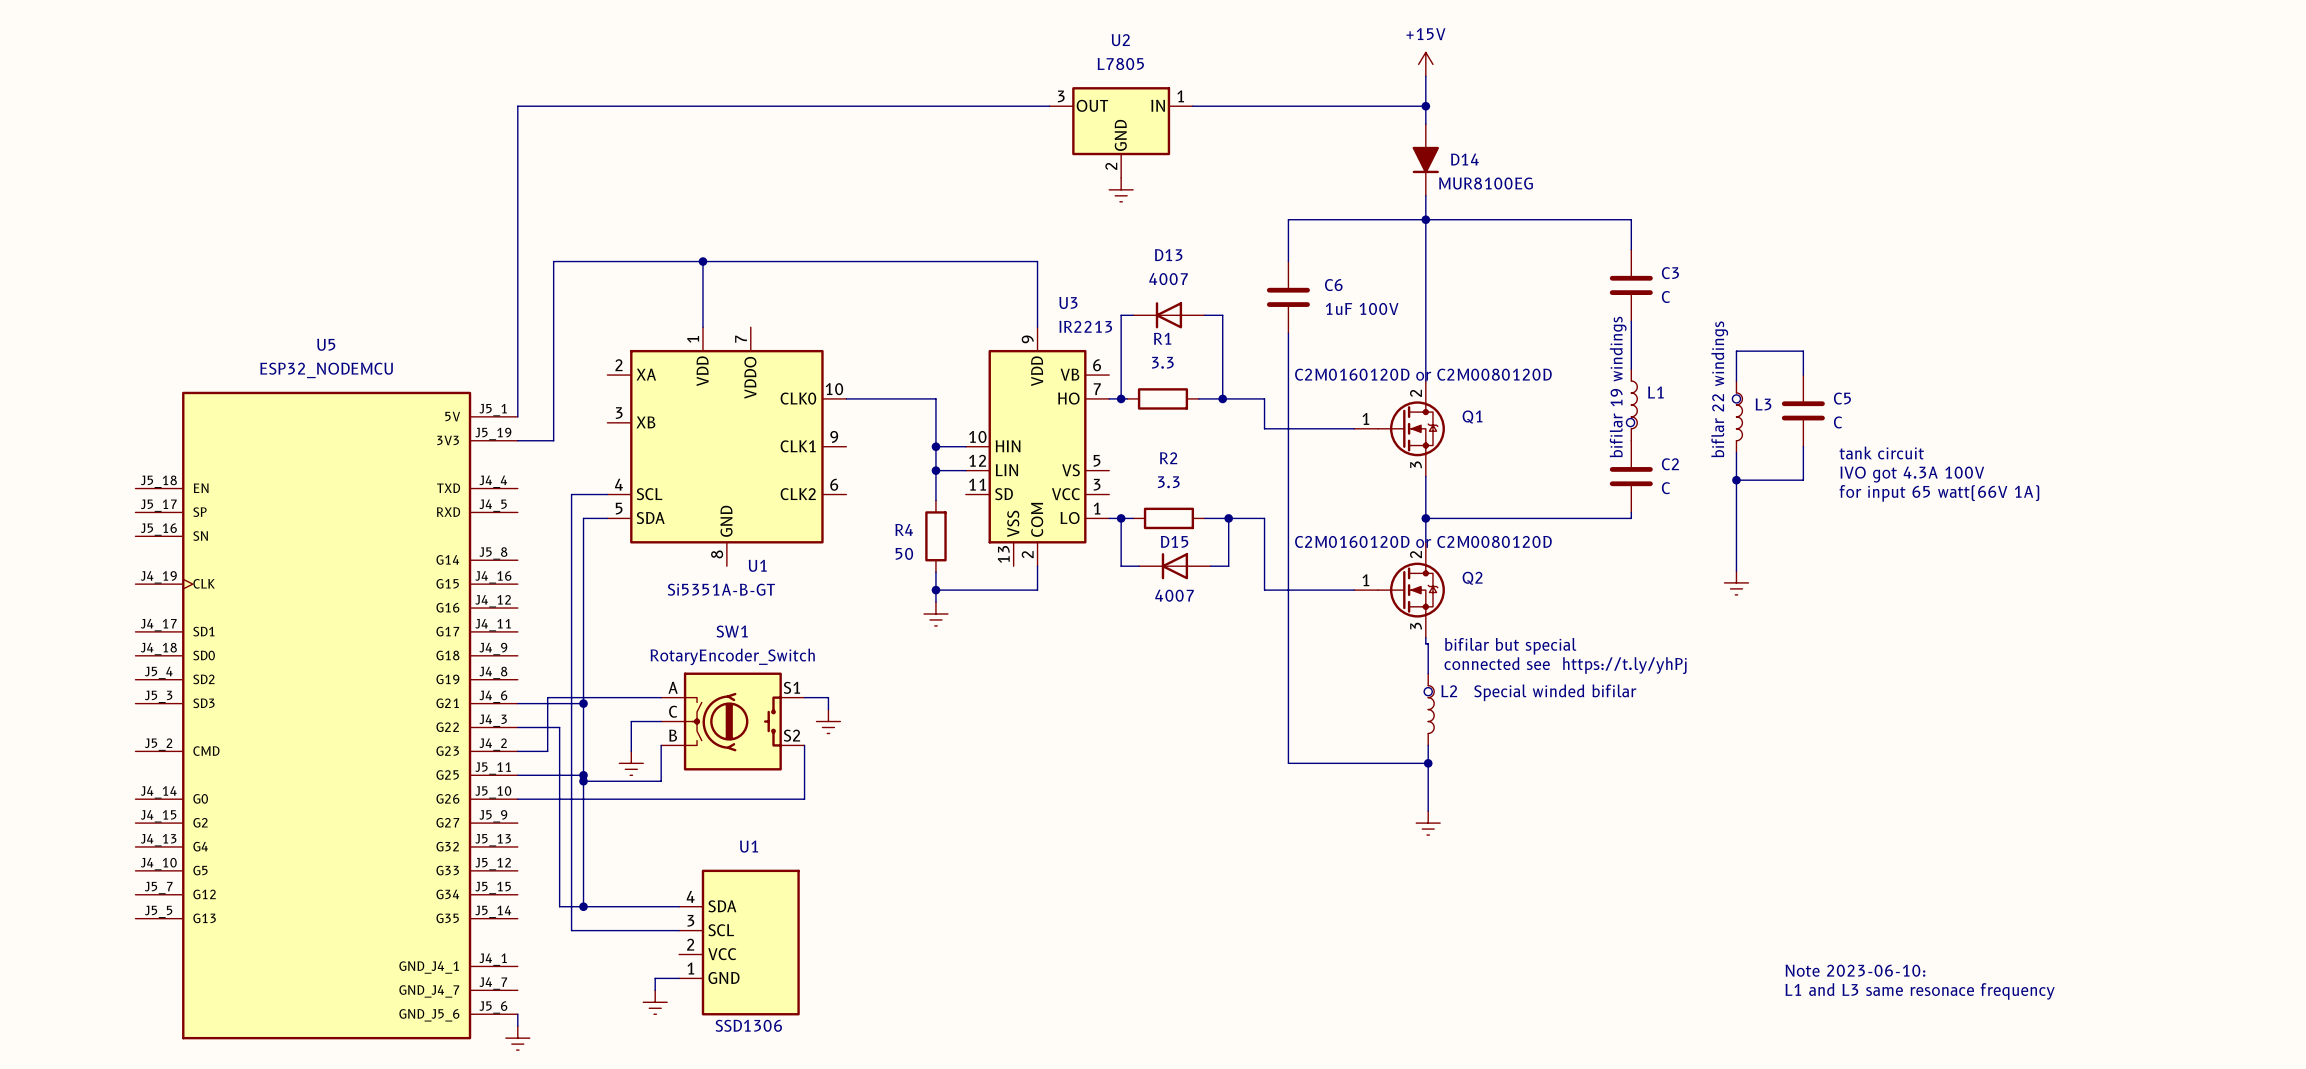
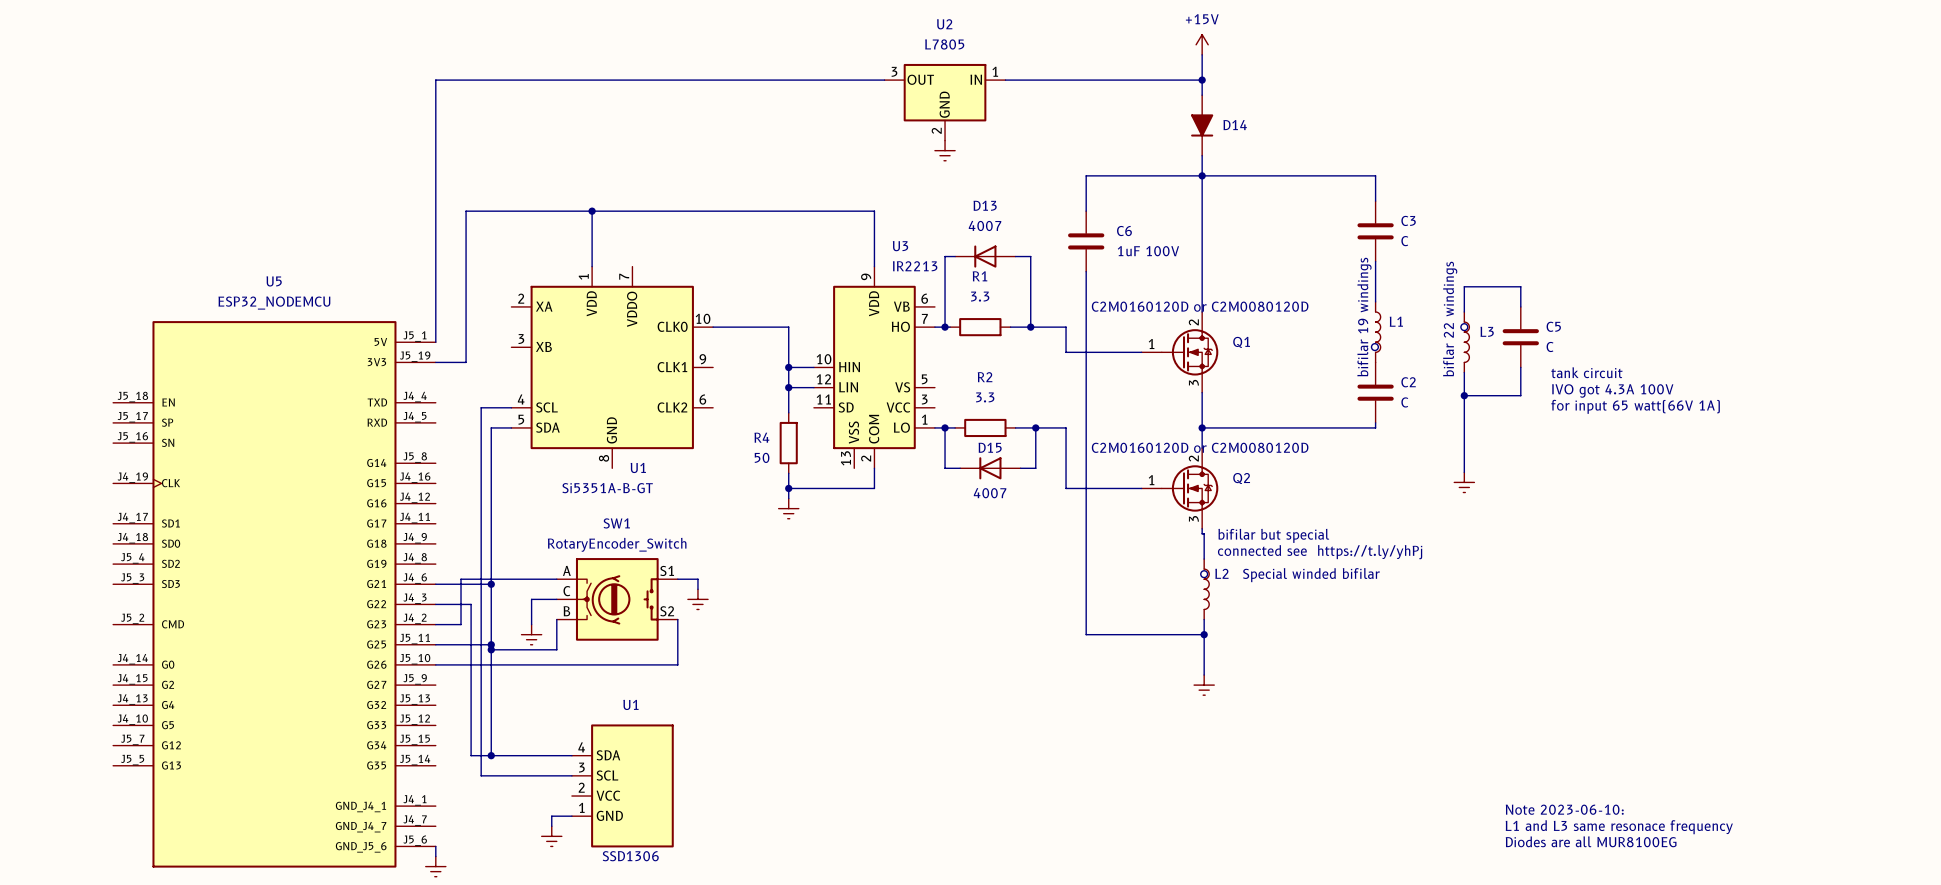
D14 value: MUR8100EG (1486, 183) -> none
text: none -> Diodes are all MUR8100EG (1591, 841)

